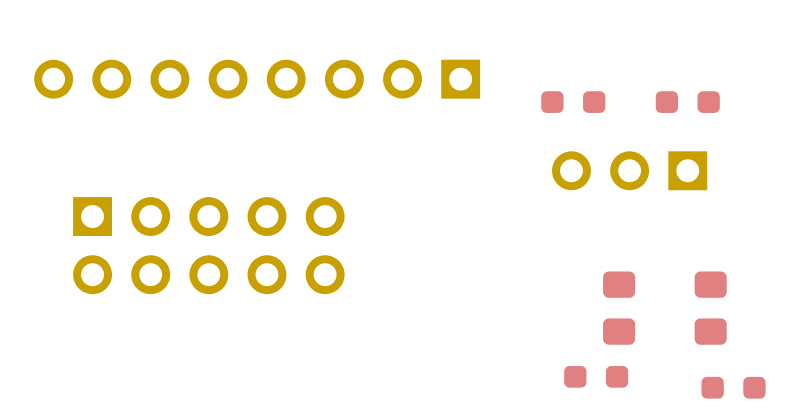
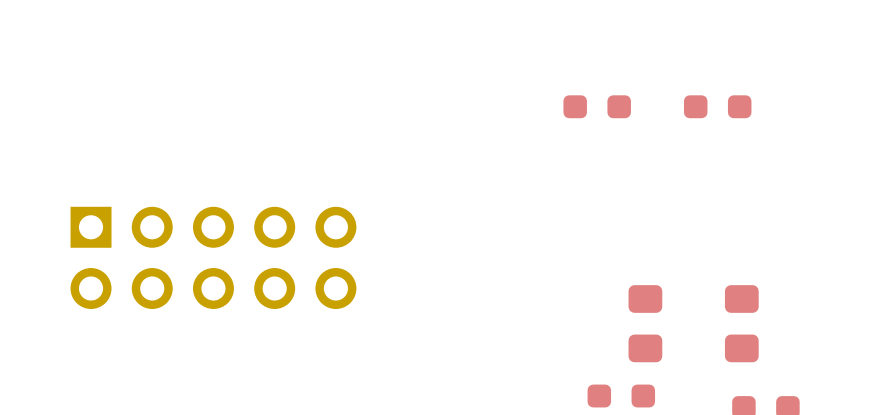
part: (257, 79) -> none
part: (629, 170) -> none

